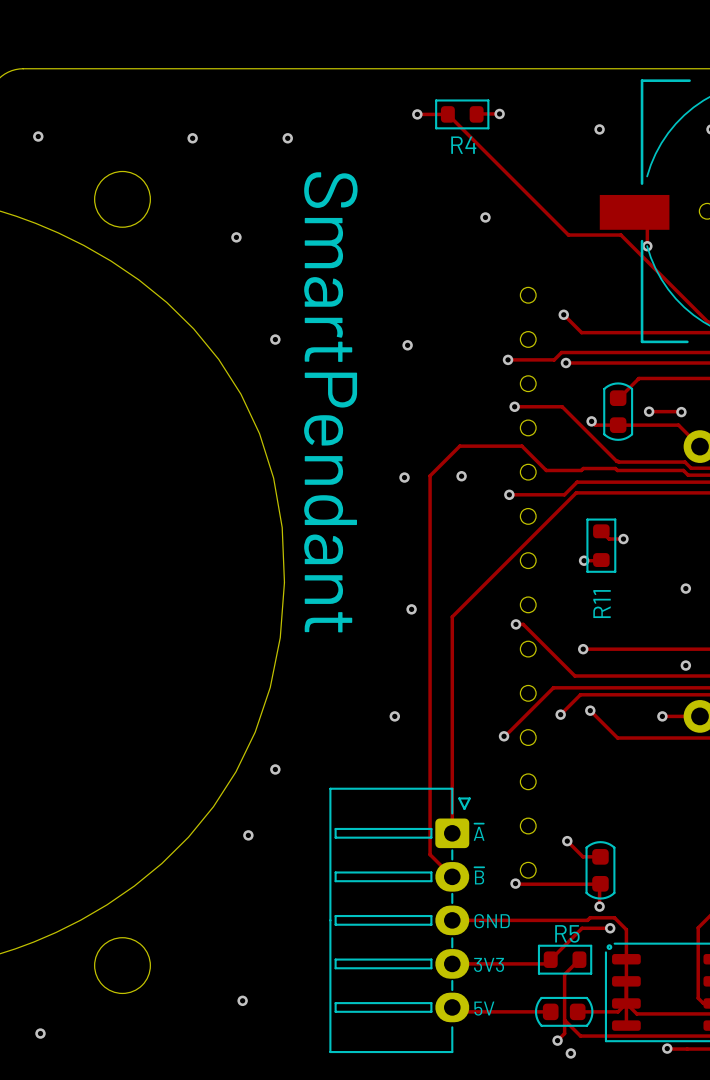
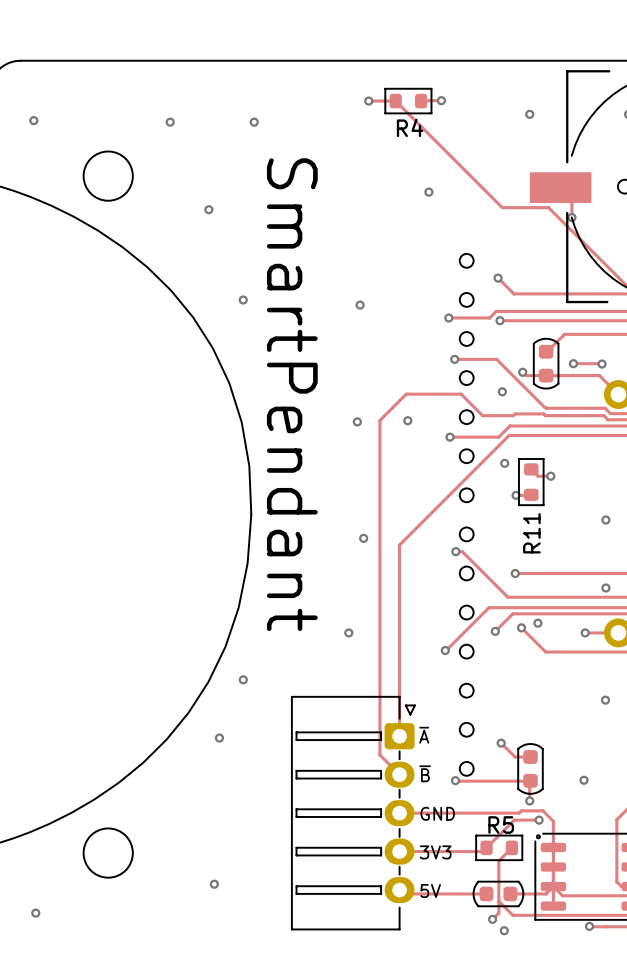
via: none -> (502, 391)
via: none -> (504, 463)
via: none -> (537, 623)
via: none -> (605, 700)
via: none -> (584, 780)

